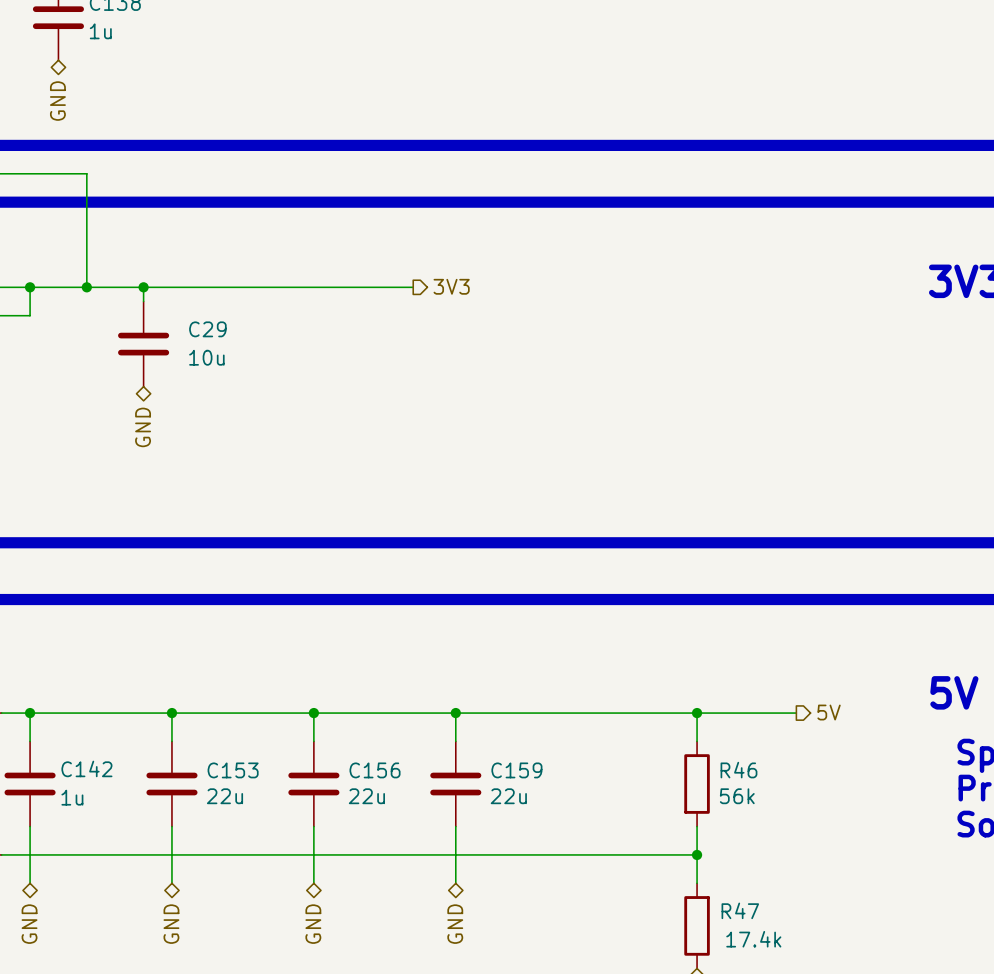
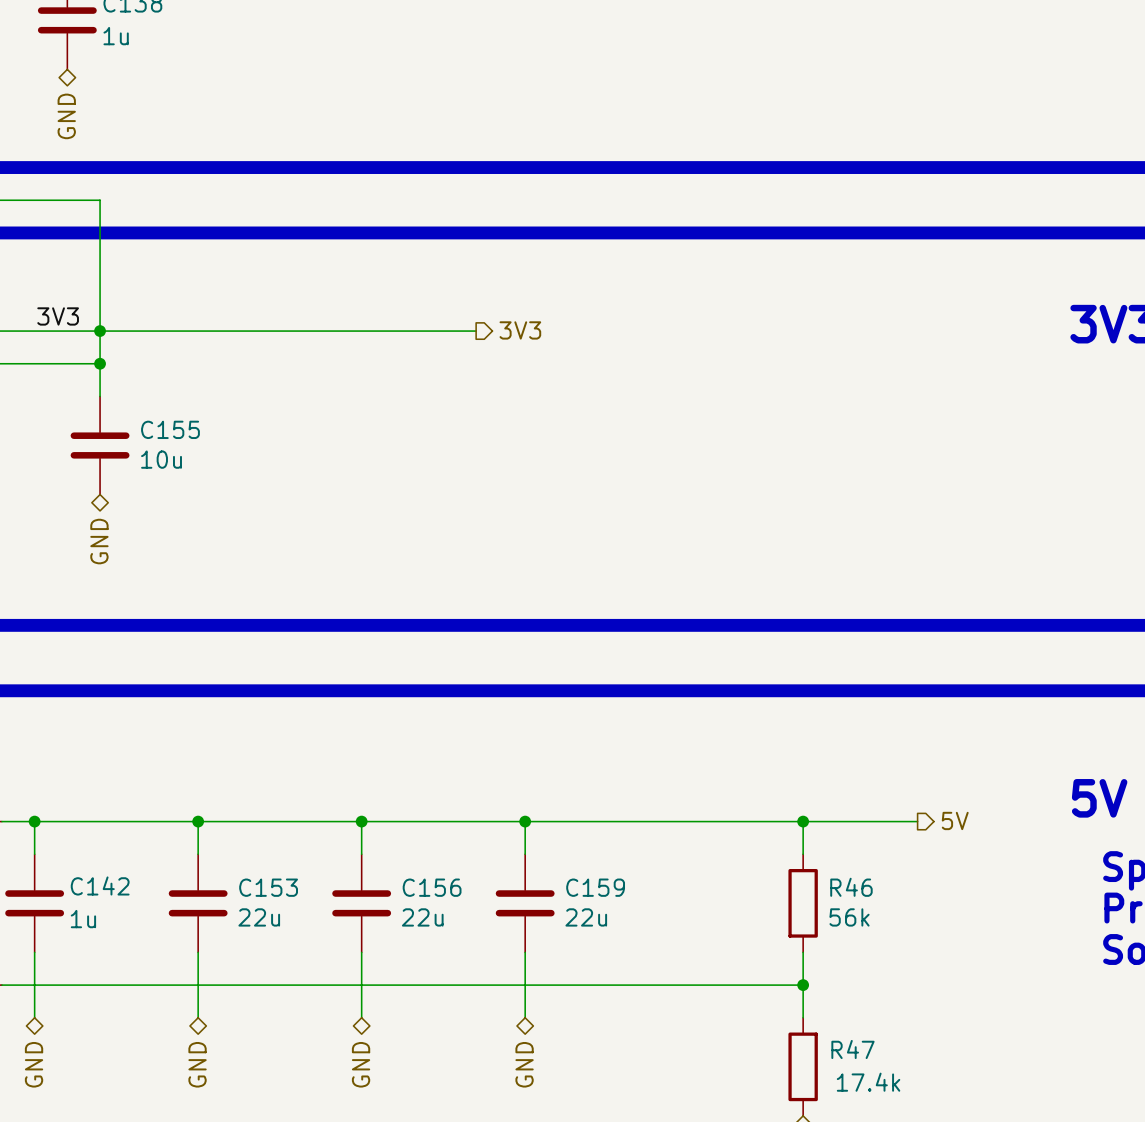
label: none -> 3V3 (58, 316)
wire: (30, 287) (30, 315) -> (100, 363) (34, 363)
junction: (30, 287) -> none
wire: none -> (100, 331) (100, 396)
wire: (143, 287) (143, 301) -> none
junction: (143, 287) -> none
junction: none -> (100, 363)
C29: 10u (143, 344) -> none
C155: none -> 10u (100, 445)
hierarchical label position: GND (143, 427) -> GND (99, 541)

